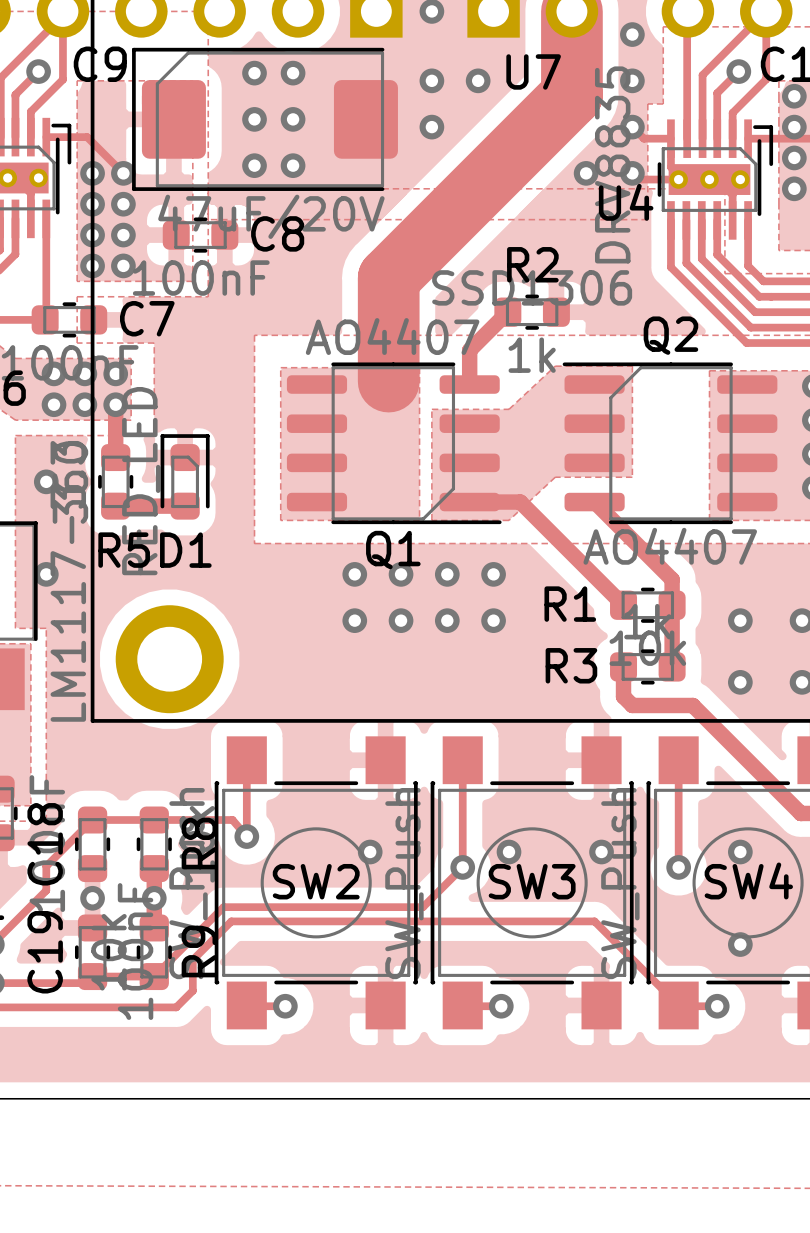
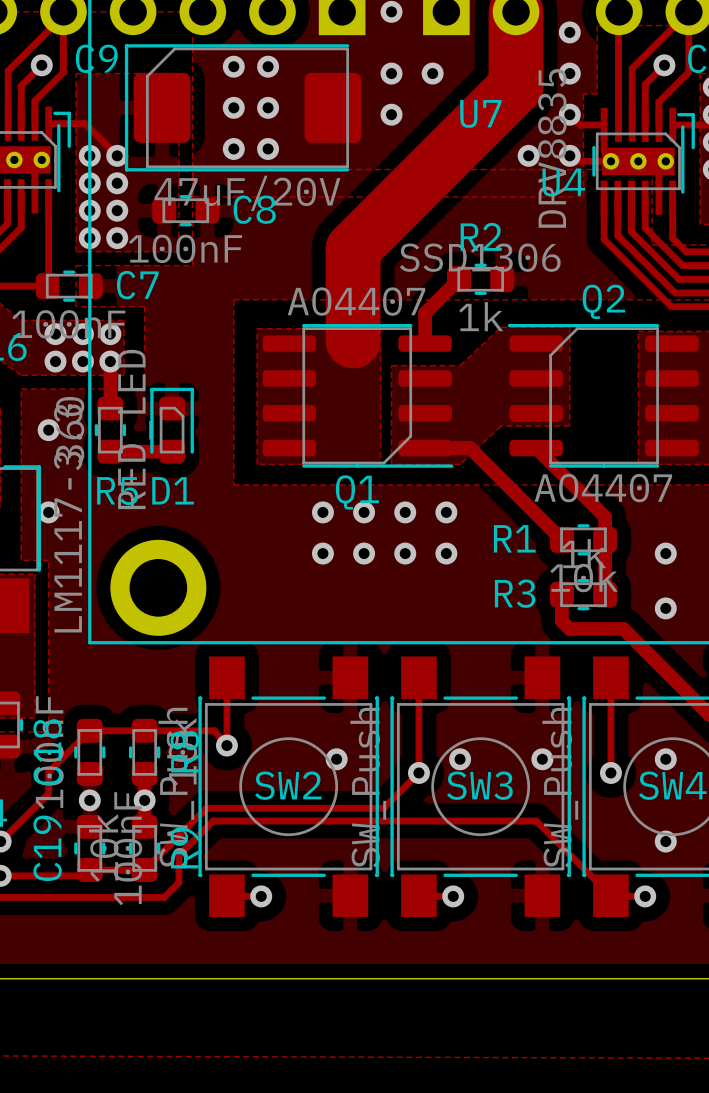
U7 name position: U7 (533, 71) -> U7 (480, 113)

